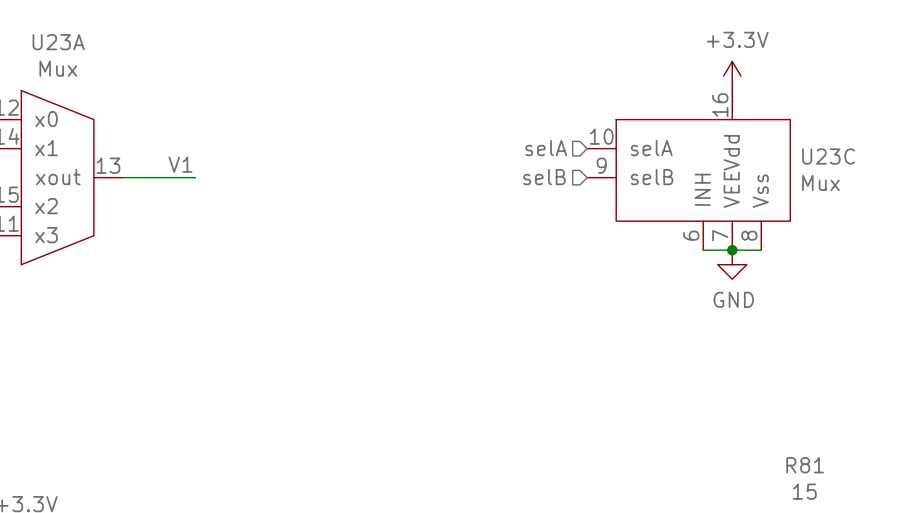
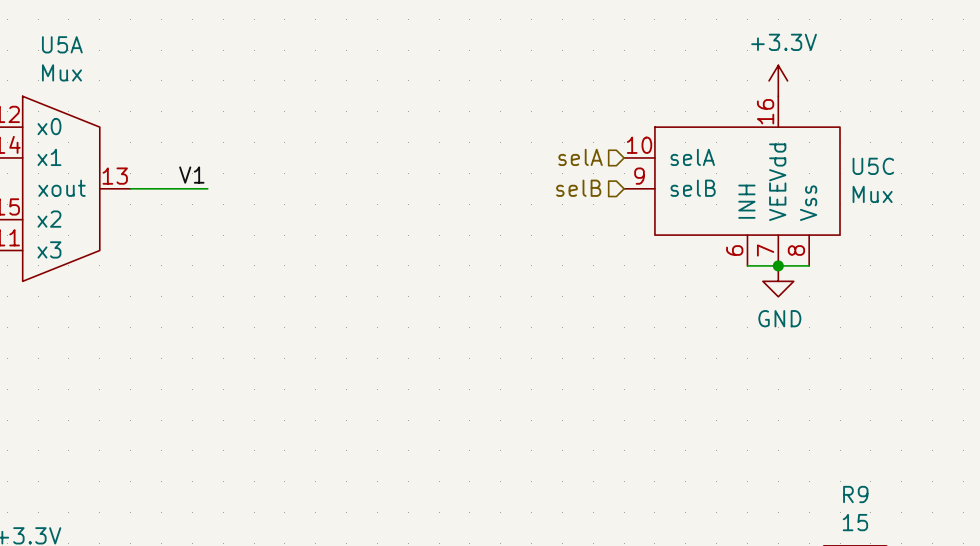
U23A name: U23A (58, 42) -> U5A (62, 44)
U23C name: U23C (828, 156) -> U5C (873, 166)
R81 name: R81 (805, 465) -> R9 (855, 494)

